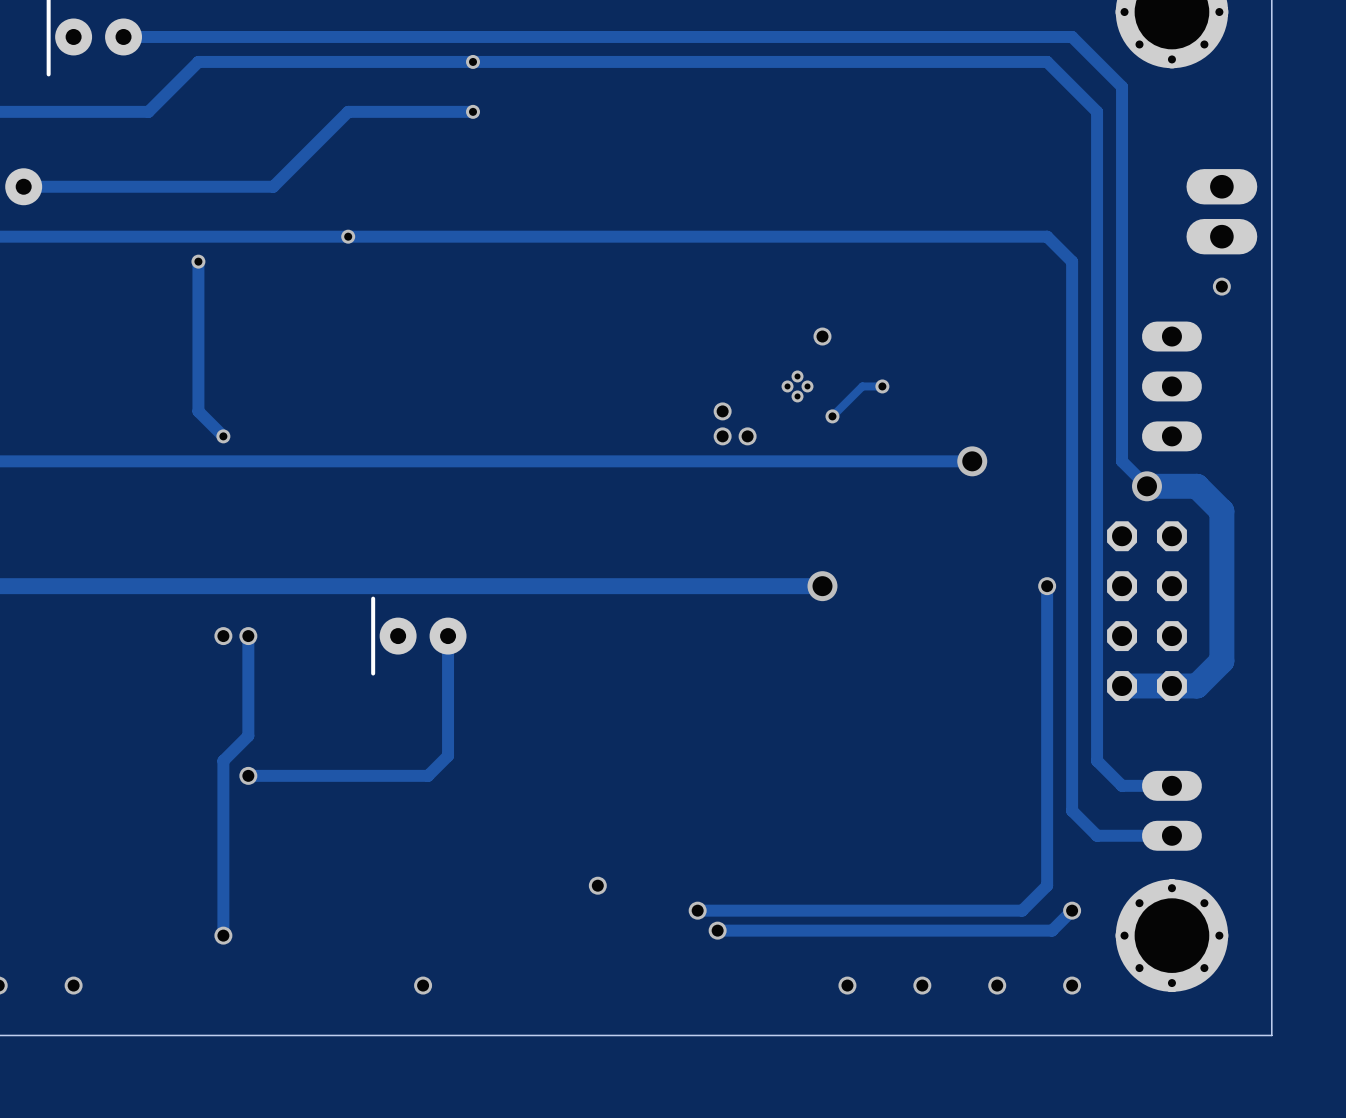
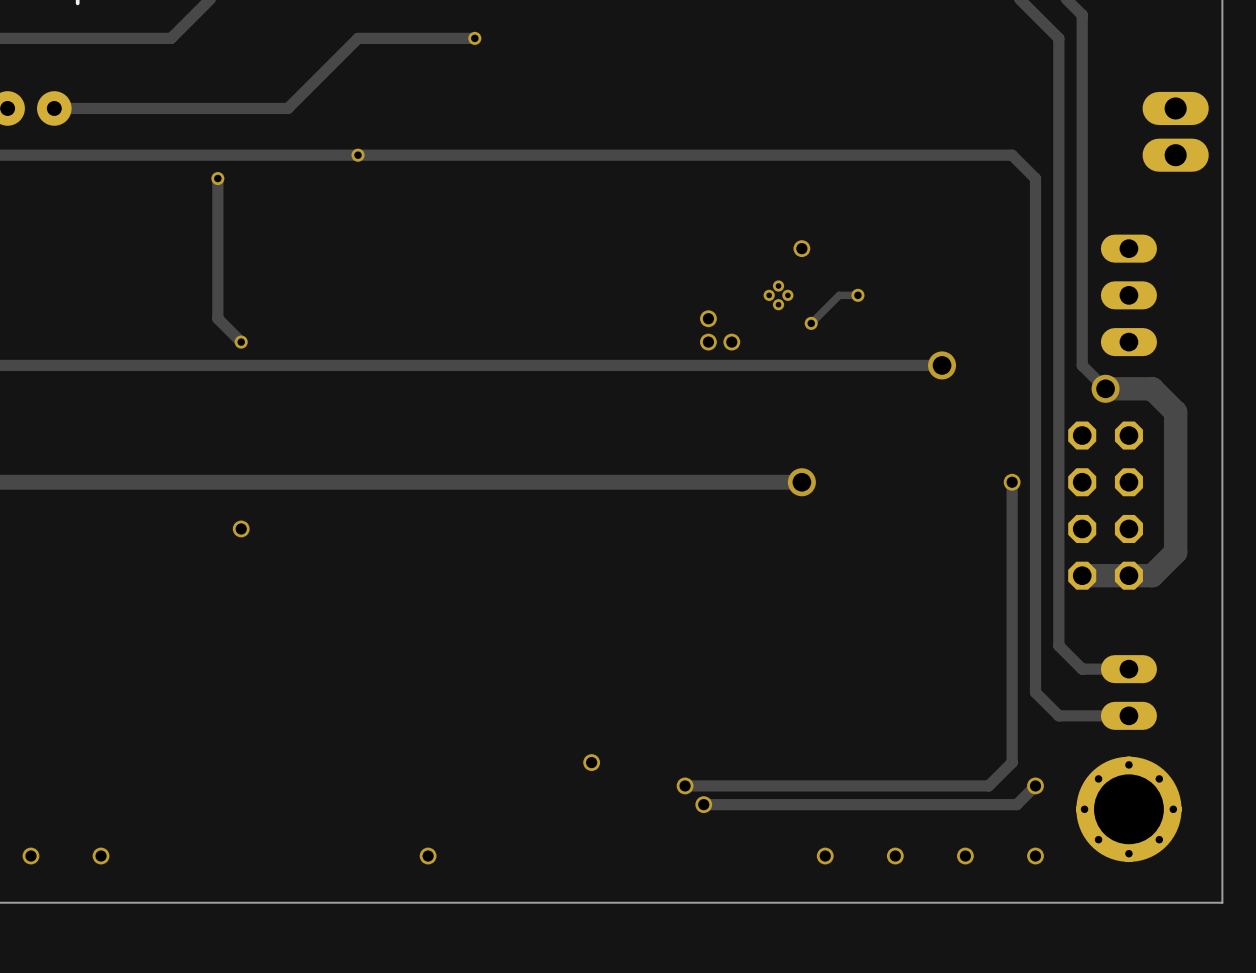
via: (1221, 286) -> none
track: (248, 636) (248, 735) (223, 760) (223, 935) -> none
via: (248, 636) -> none
part: (418, 636) -> none
track: (448, 636) (448, 755) (428, 775) (248, 775) -> none
via: (248, 775) -> none
via: (223, 935) -> none

